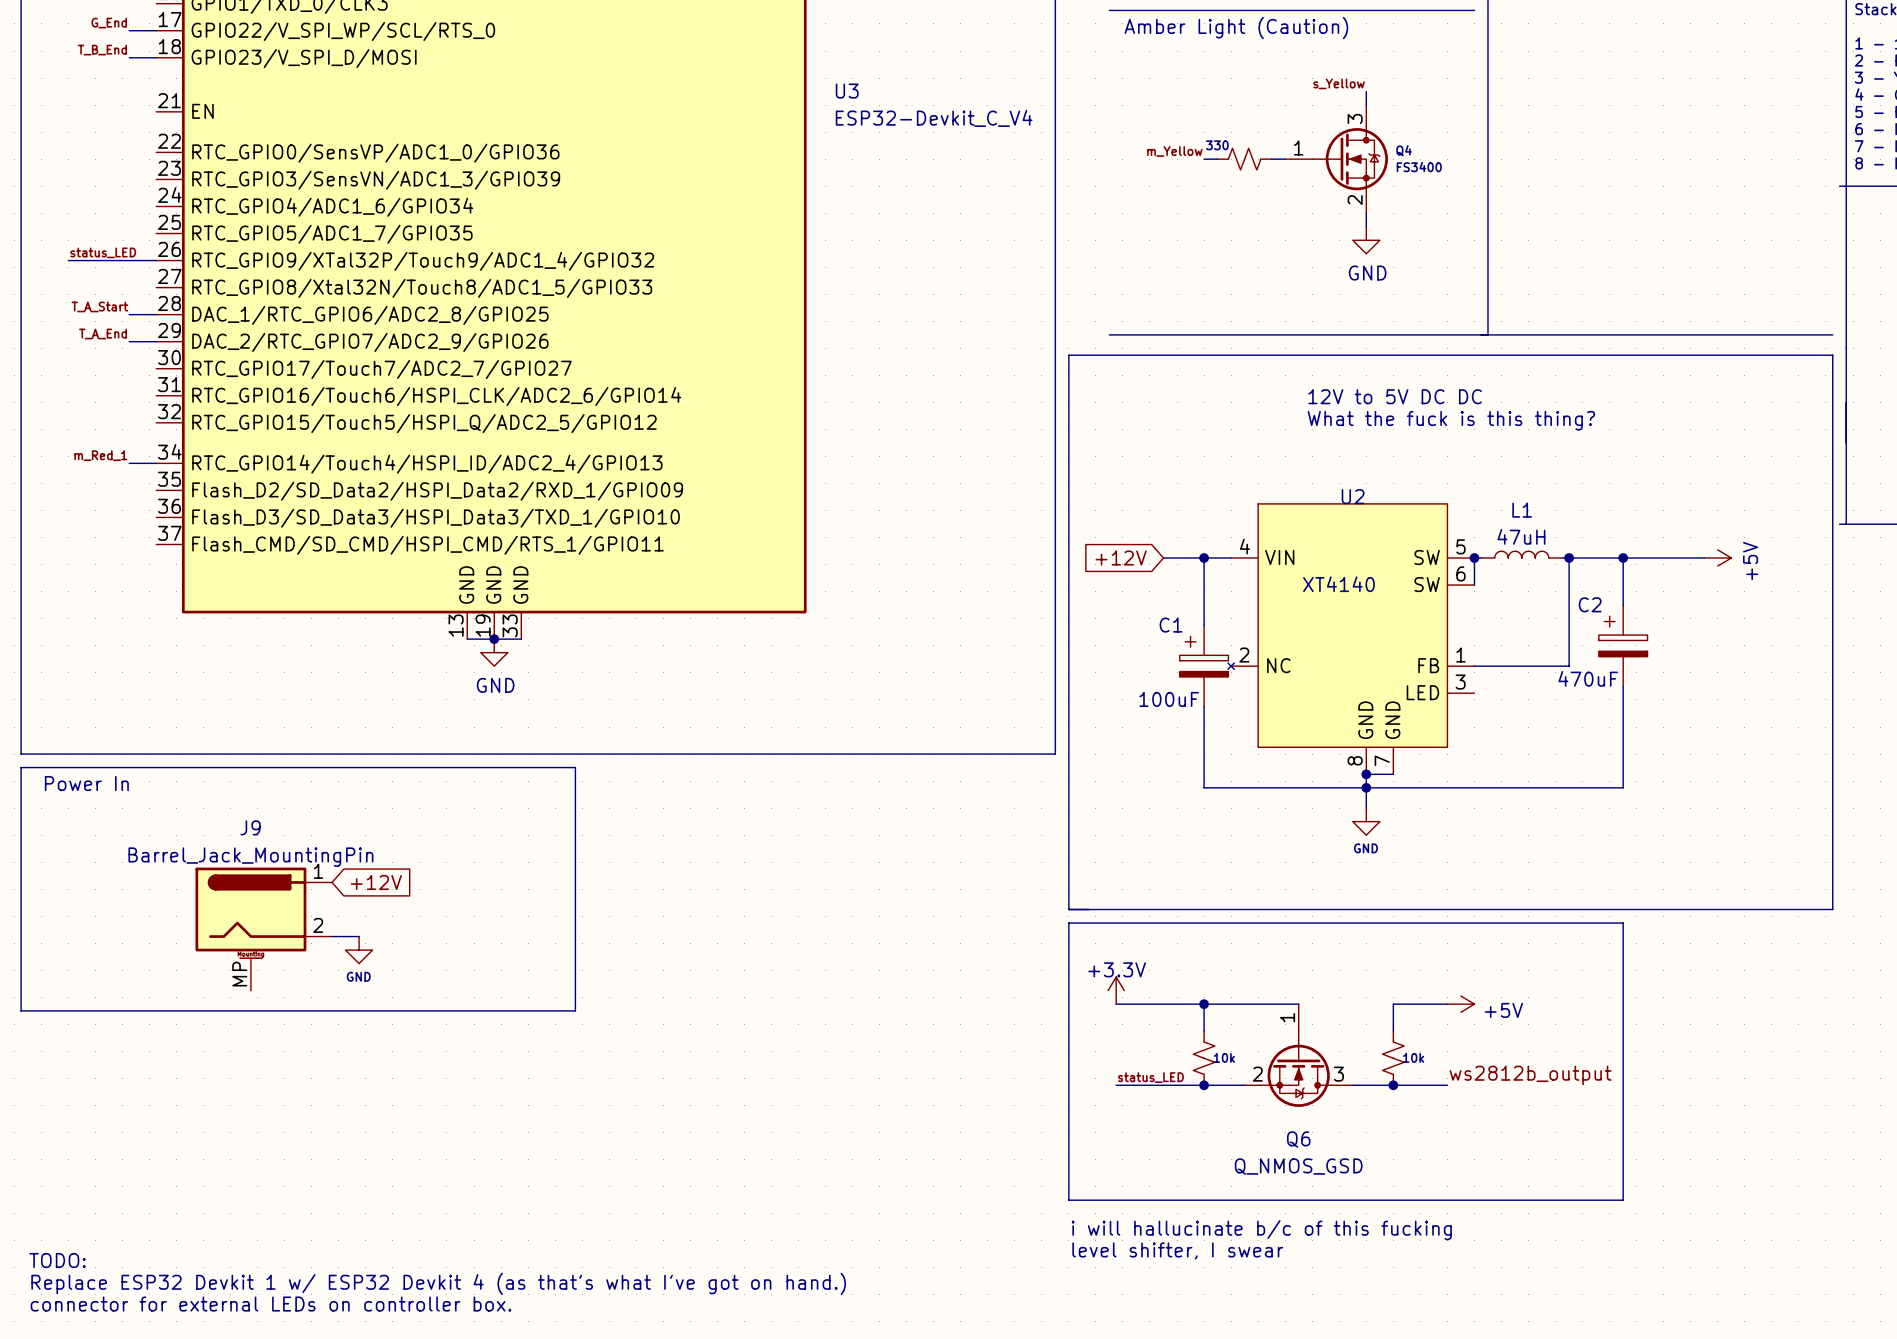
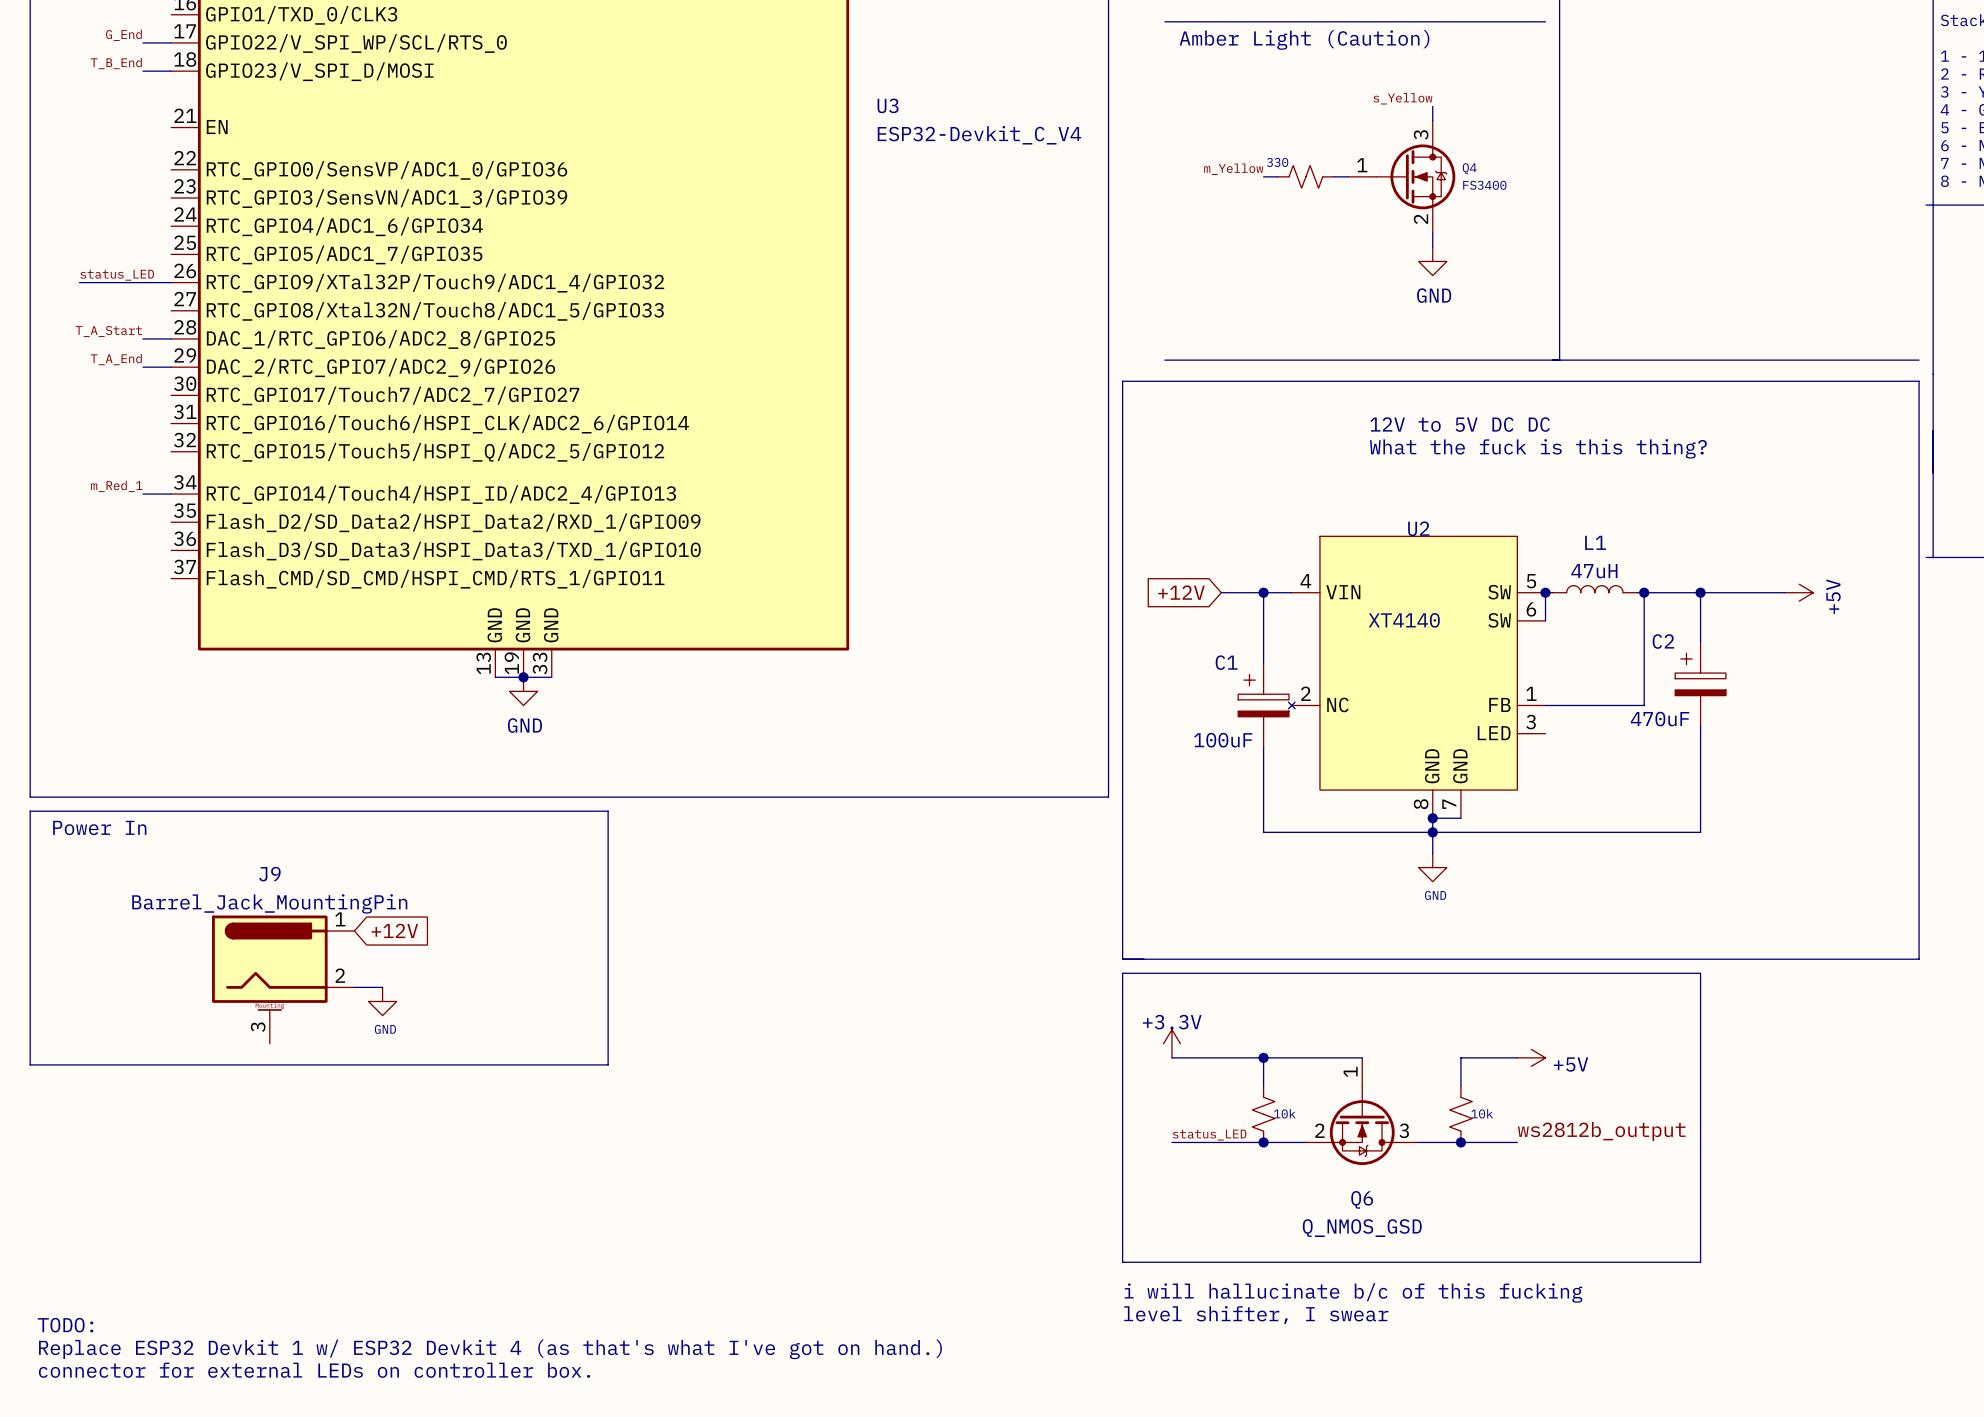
J9 pin number: MP (239, 974) -> 3 (258, 1027)

